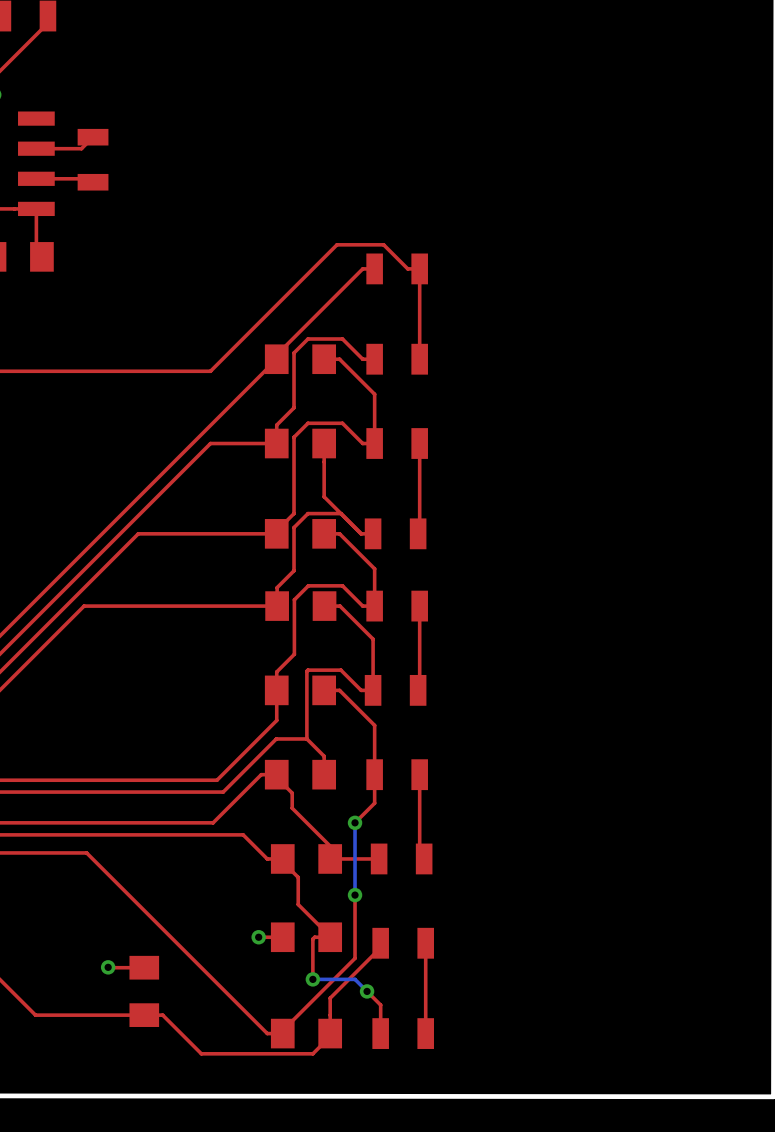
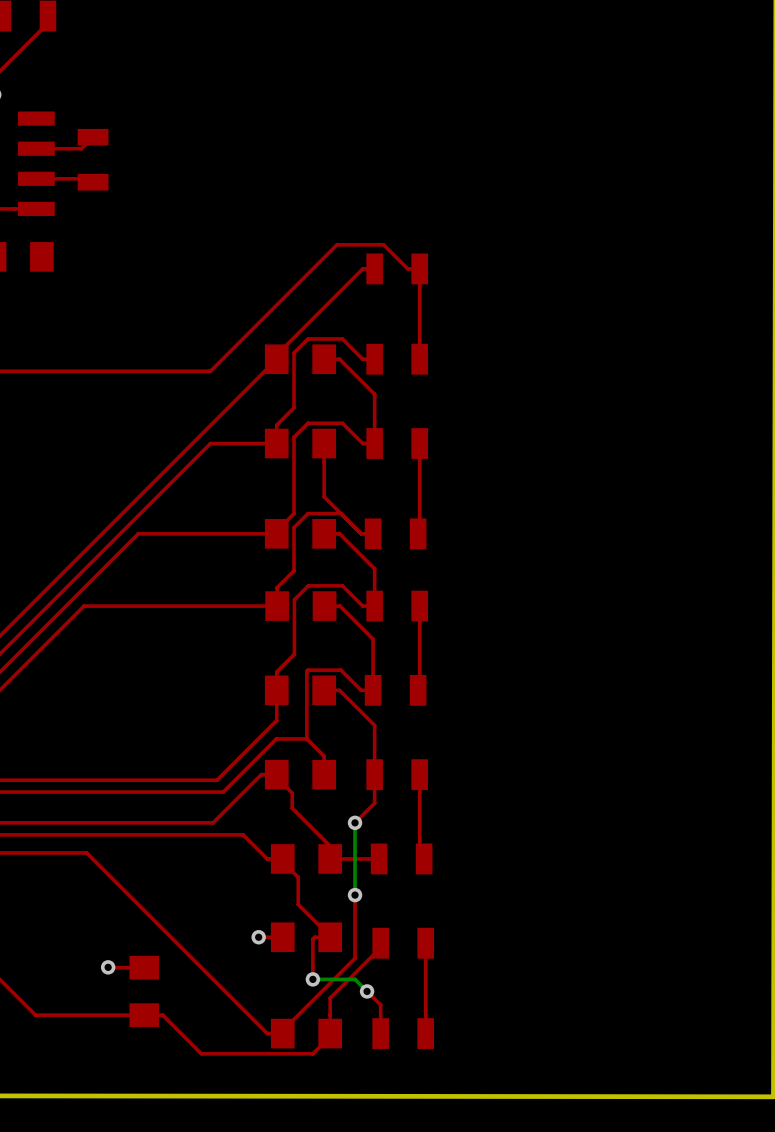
top track: (36, 208) (36, 251) (41, 256) -> none

